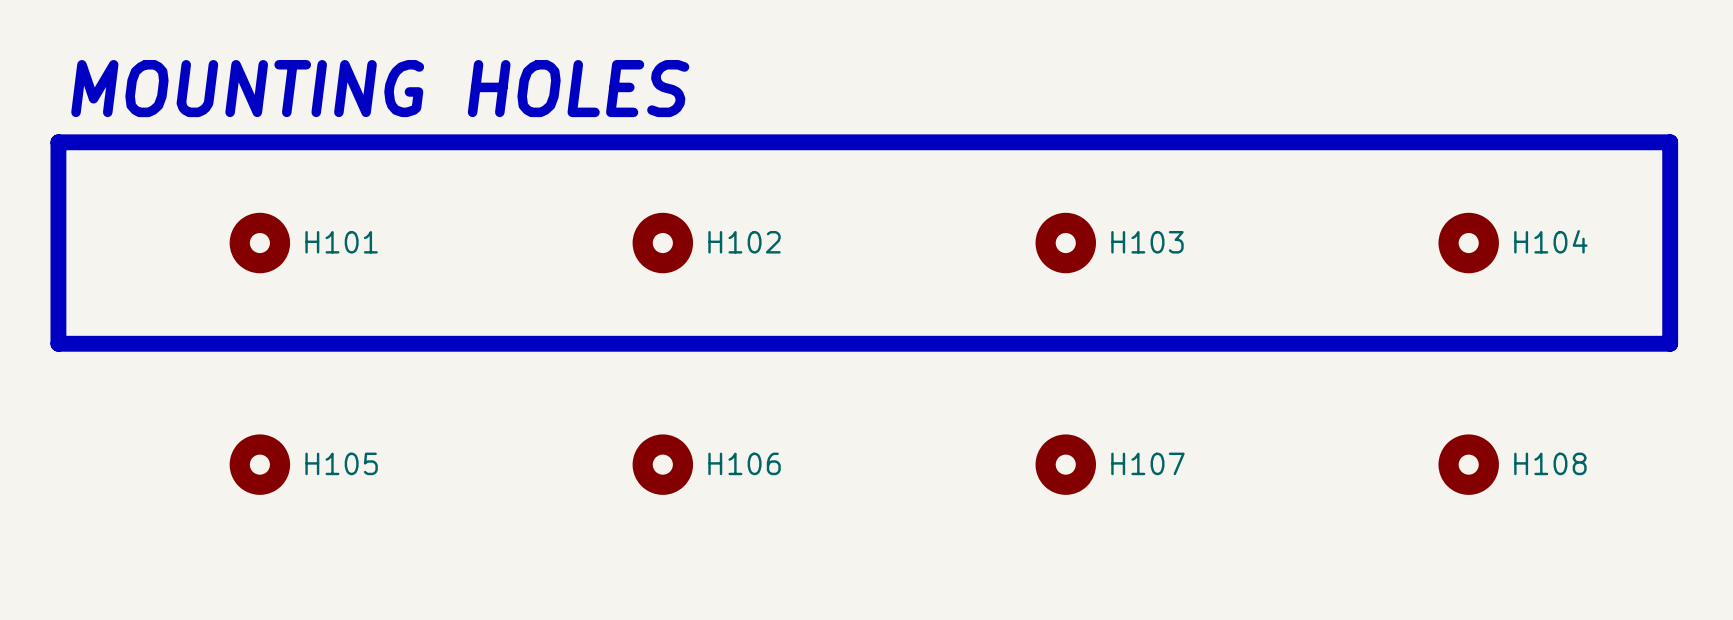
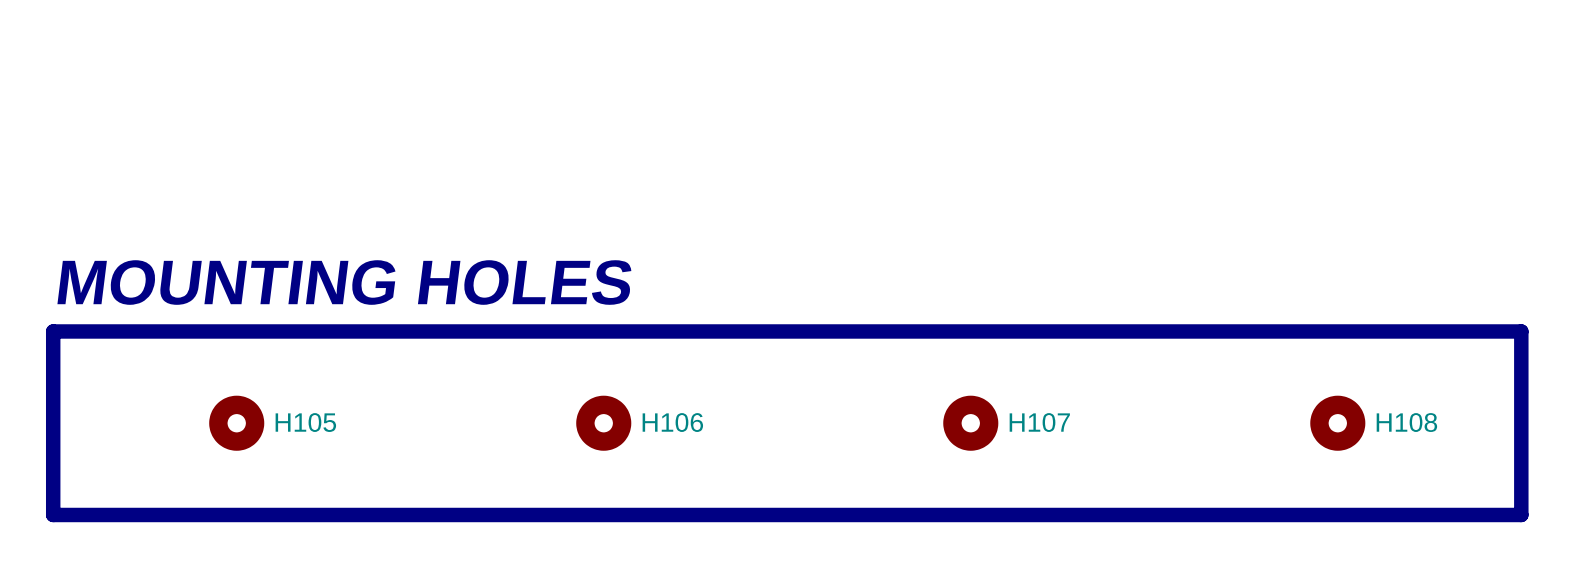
text position: MOUNTING HOLES (380, 88) -> MOUNTING HOLES (344, 282)
line: (58, 142) (1670, 142) (1670, 343) (58, 343) (58, 142) -> (53, 331) (1521, 331) (1521, 514) (53, 514) (53, 331)
H101: (259, 243) -> none
H102: (662, 243) -> none
H103: (1065, 243) -> none
H104: (1468, 243) -> none

